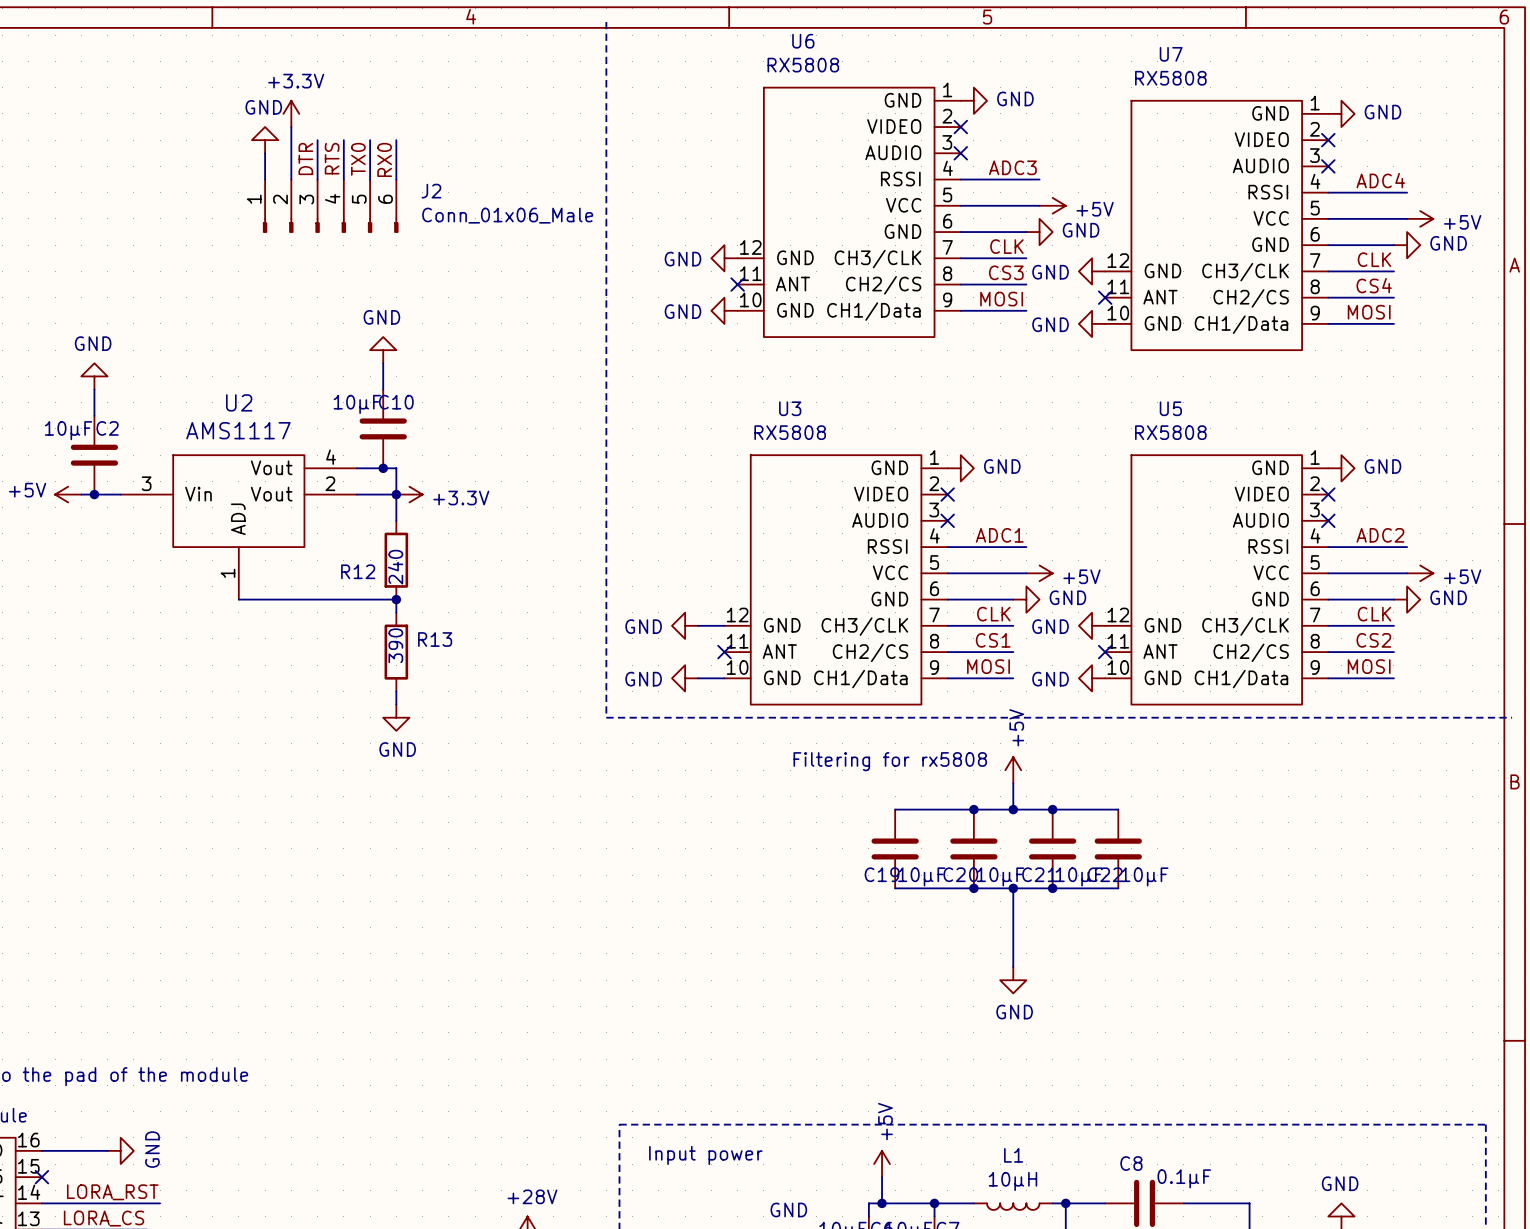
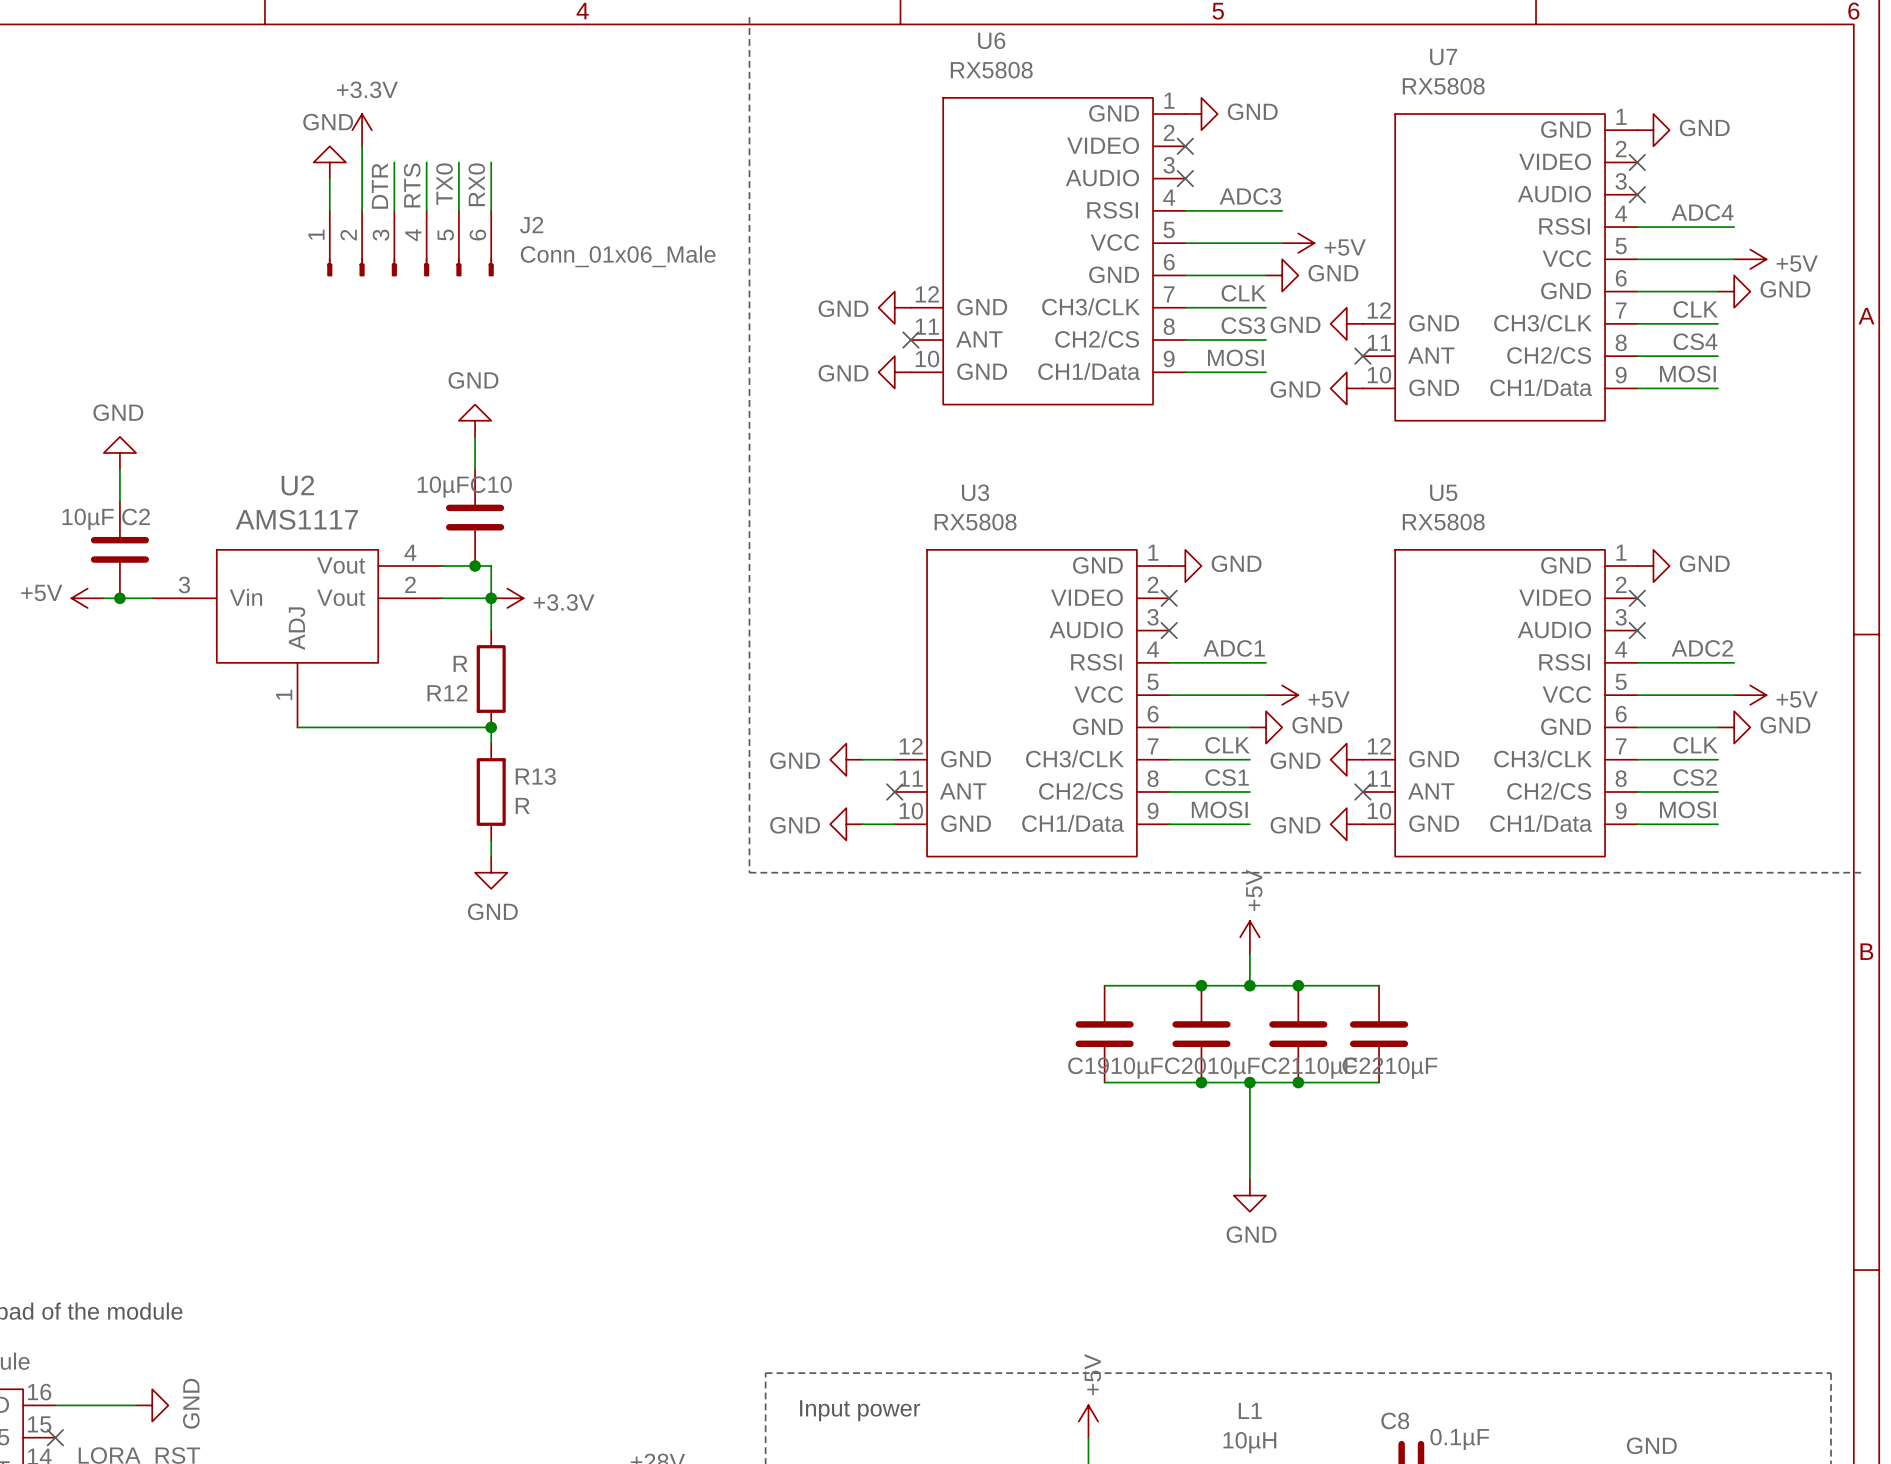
R12 value: 240 (395, 567) -> R (460, 663)
R13 value: 390 (395, 645) -> R (522, 805)
text: Filtering for rx5808 (890, 761) -> none

